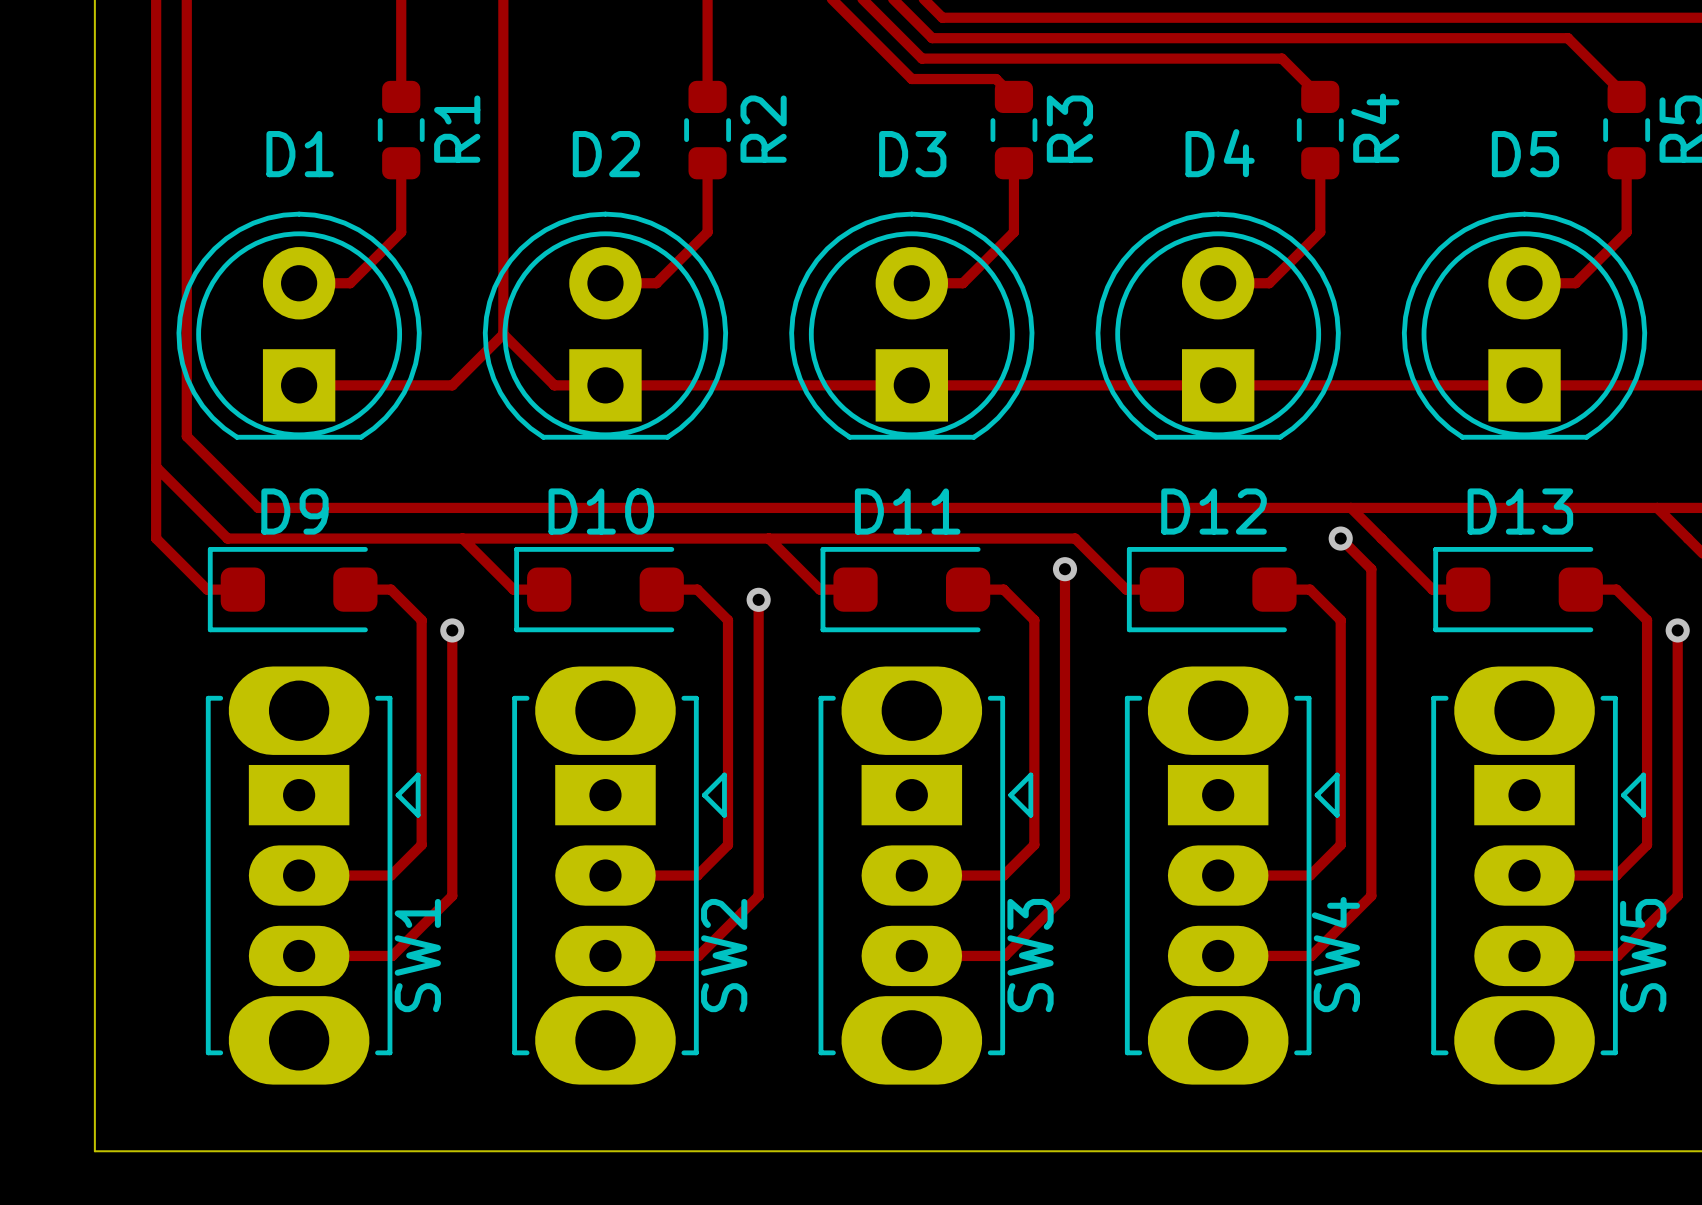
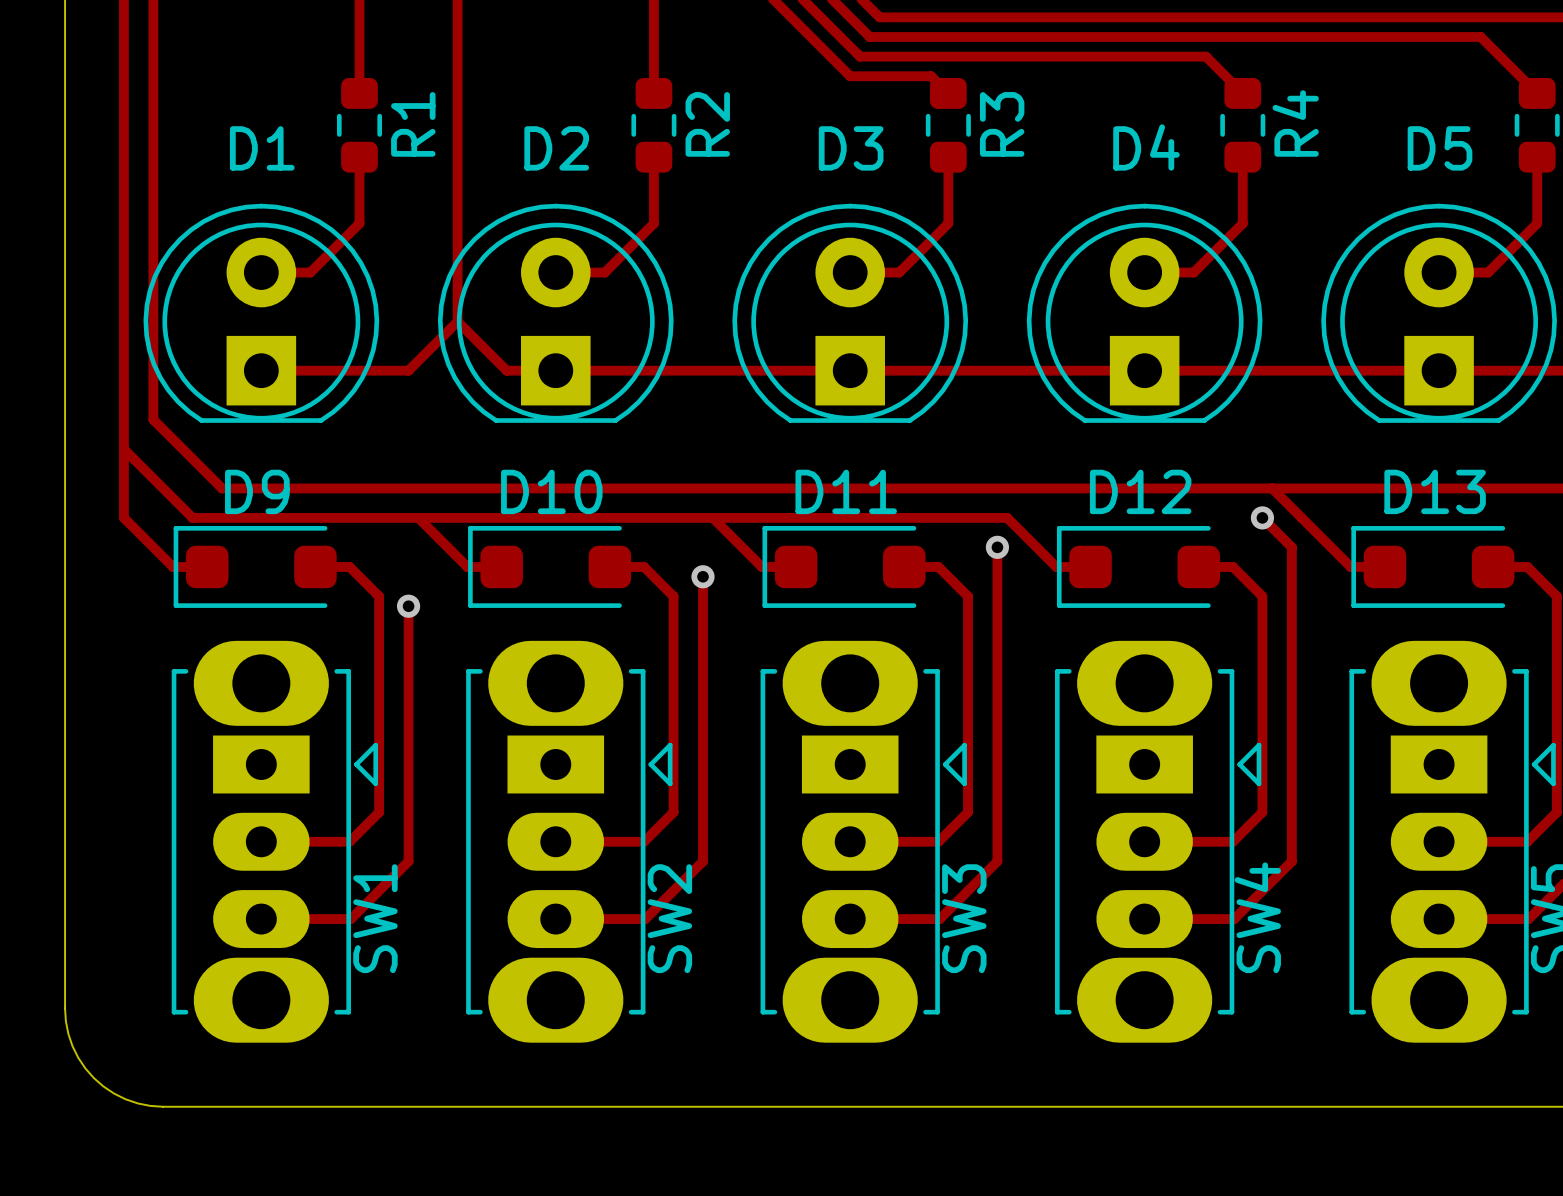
board edge: (94, 1049) (94, 1151) (197, 1151) -> (65, 1008) (65, 1021) (72, 1046) (85, 1068) (93, 1078) (114, 1093) (125, 1099) (137, 1103) (163, 1106)

